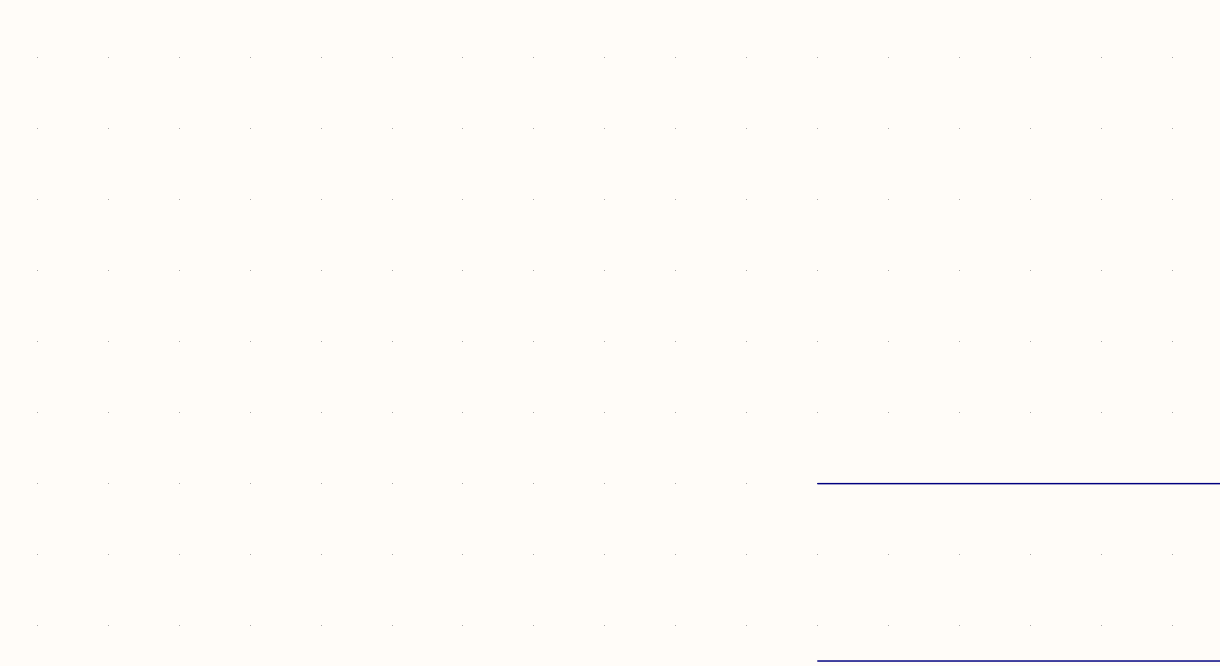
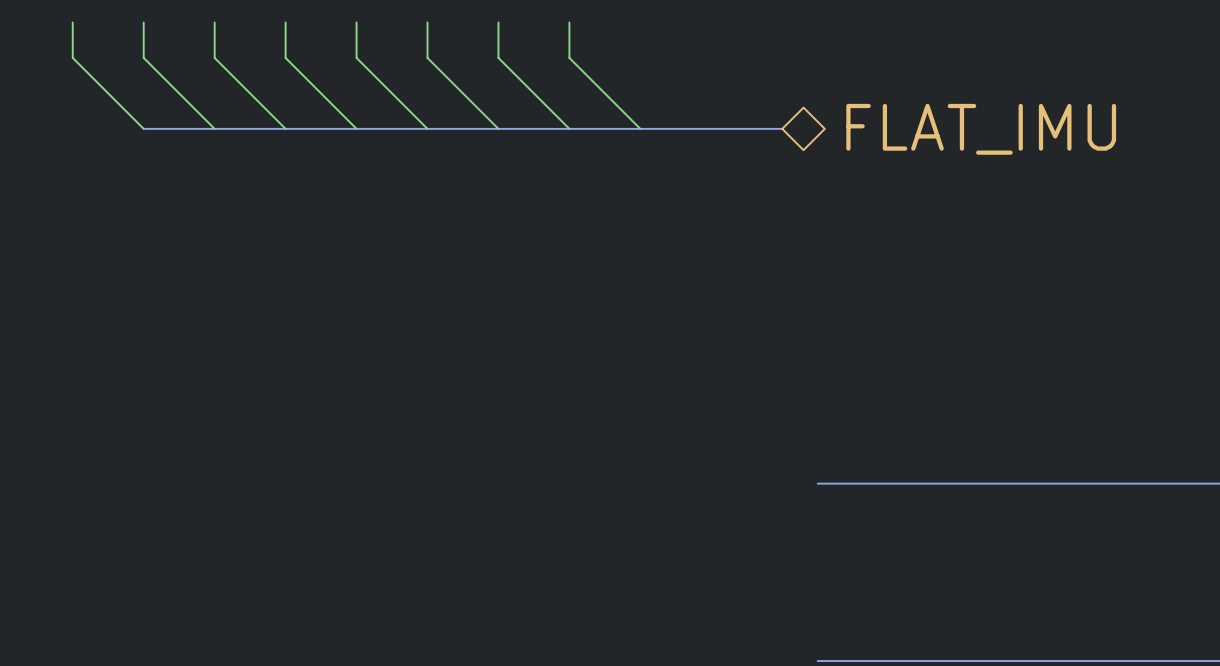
wire: none -> (72, 22) (72, 57) (143, 128)
wire: none -> (143, 22) (143, 57) (214, 128)
wire: none -> (214, 22) (214, 57) (285, 128)
wire: none -> (285, 22) (285, 57) (356, 128)
wire: none -> (356, 22) (356, 57) (427, 128)
wire: none -> (427, 22) (427, 57) (498, 128)
wire: none -> (498, 22) (498, 57) (569, 128)
wire: none -> (569, 22) (569, 57) (640, 128)
bus: none -> (143, 128) (782, 128)
hierarchical label: none -> FLAT_IMU (981, 129)

